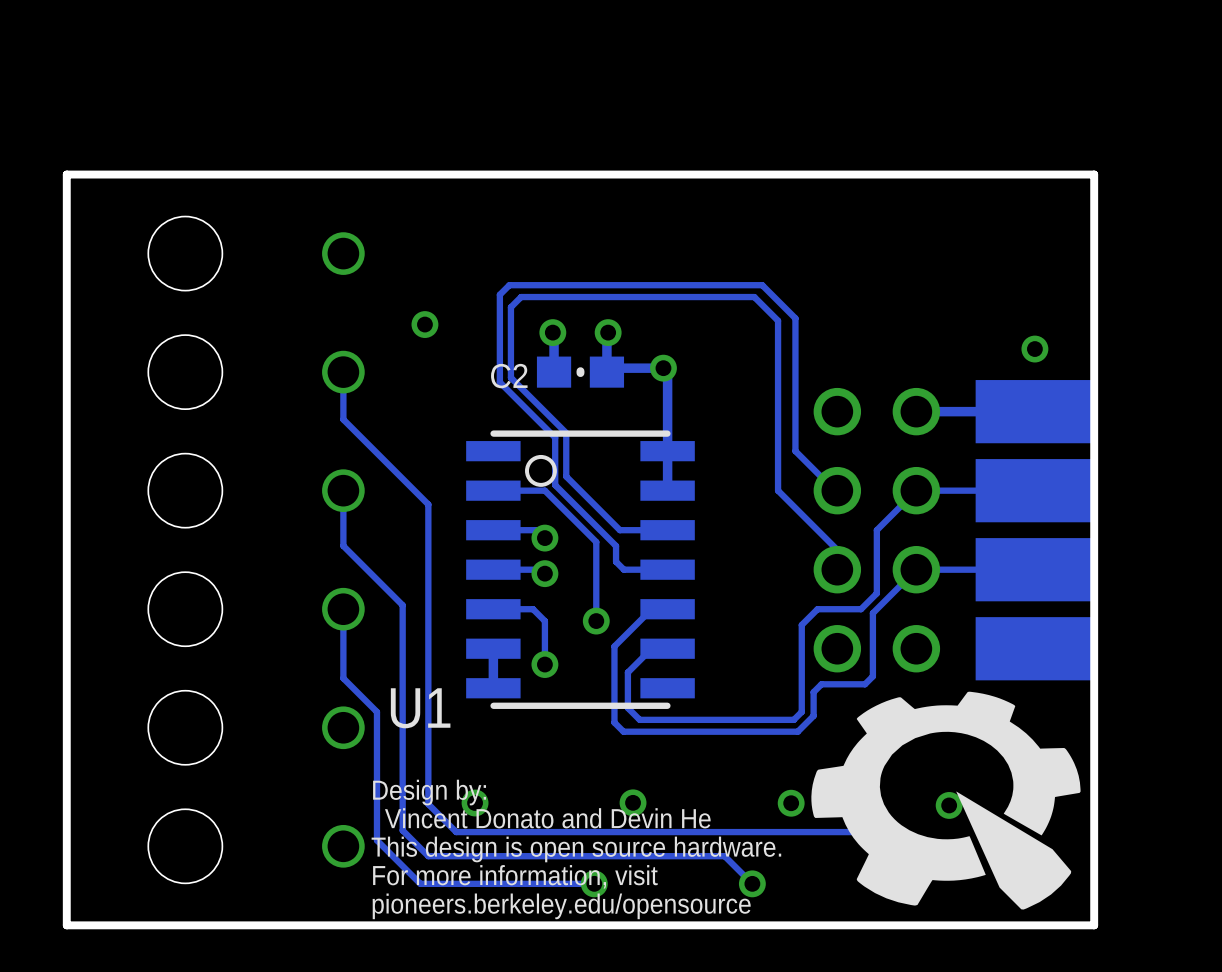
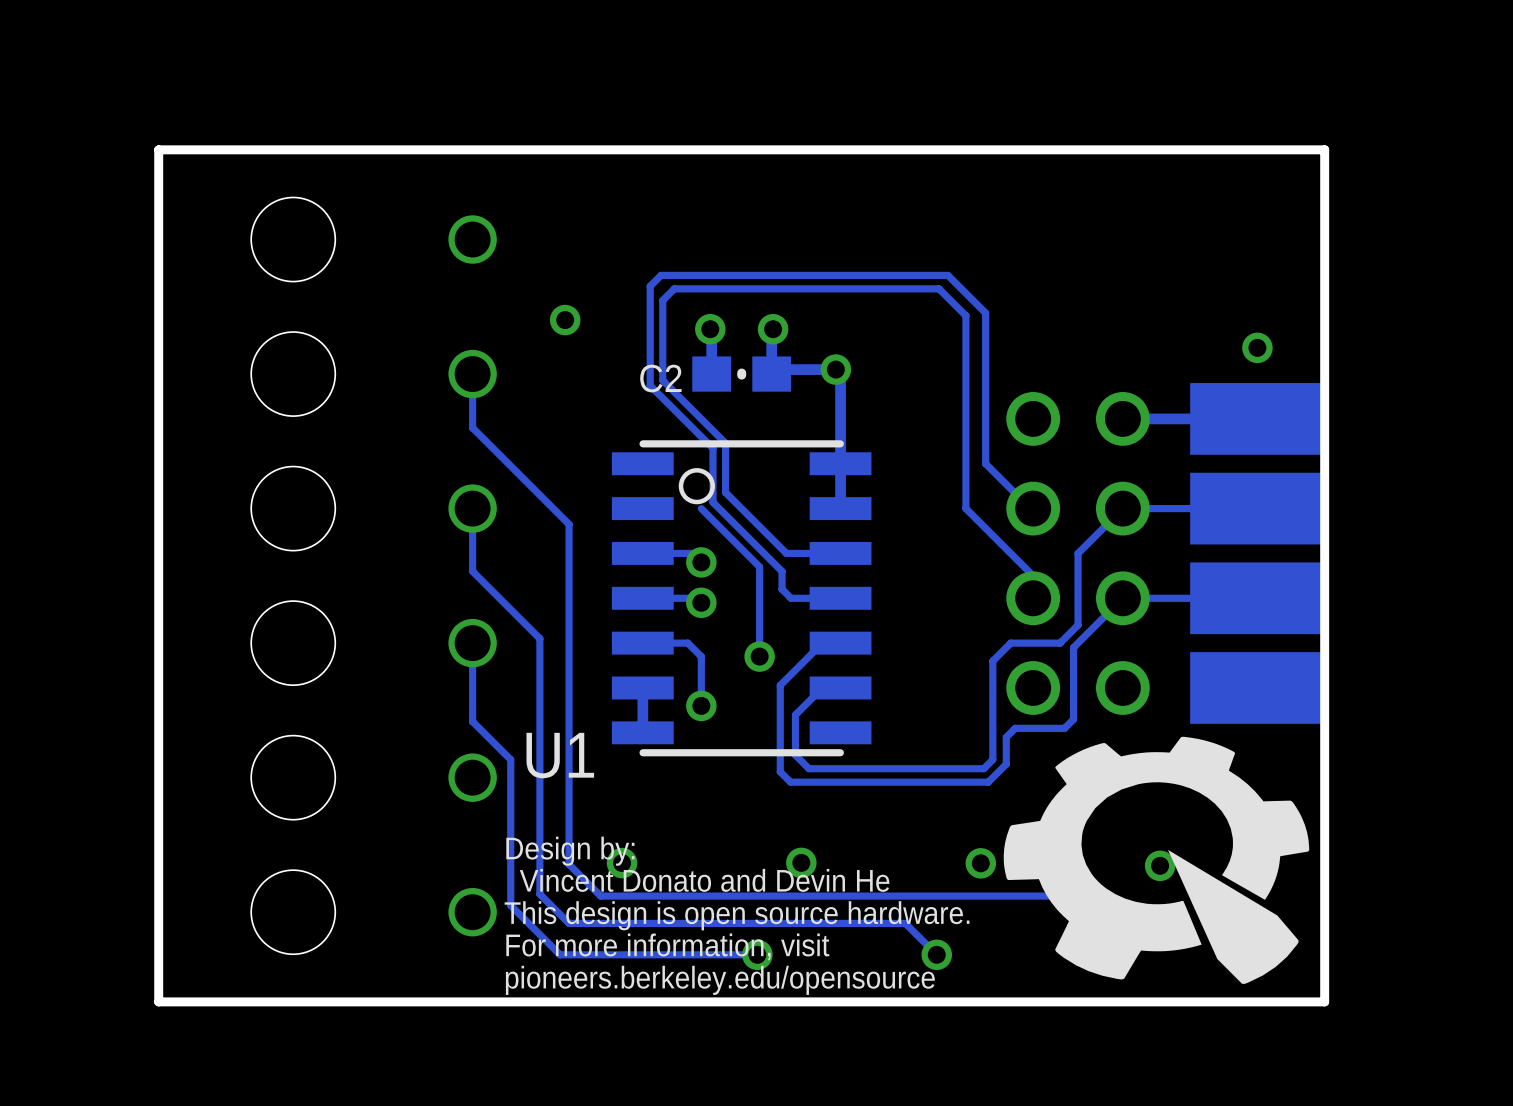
track: (544, 490) (493, 490) -> none

